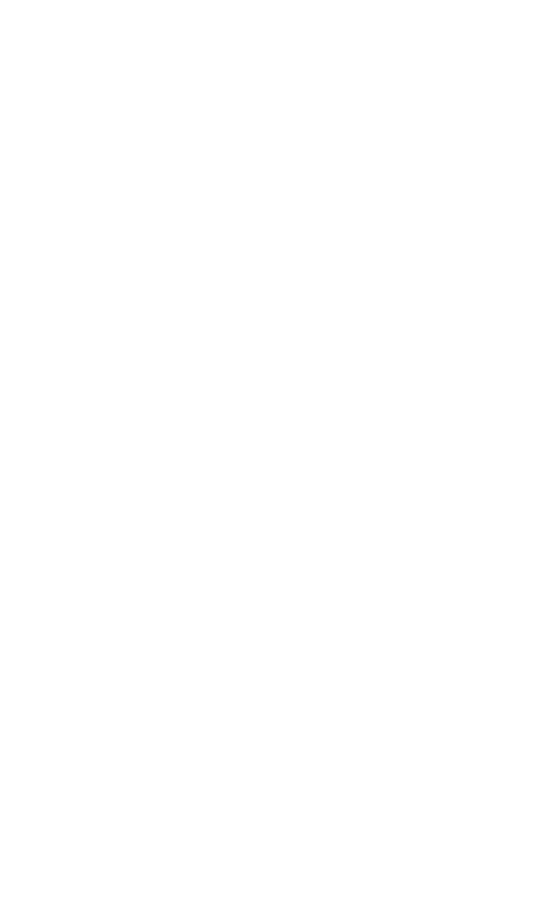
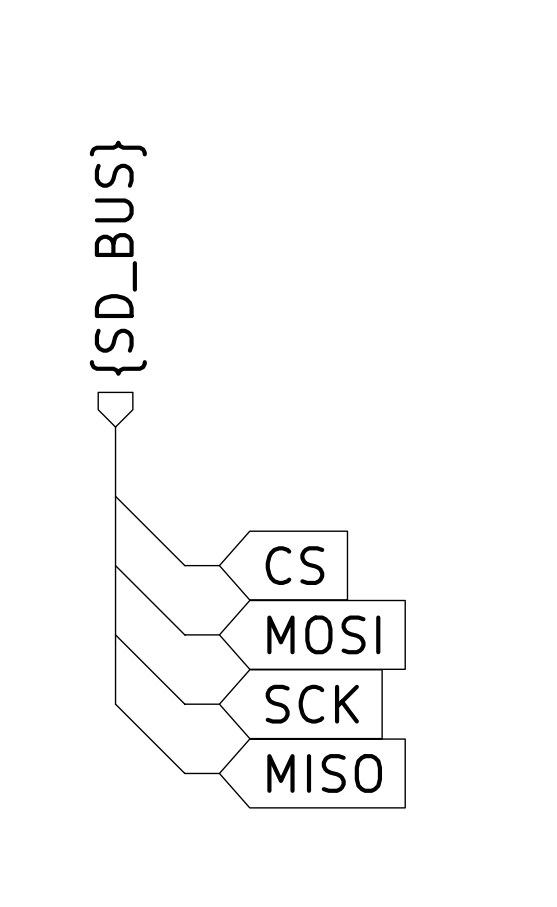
hierarchical label: none -> {SD_BUS} (118, 258)
bus: none -> (115, 427) (115, 704)
wire: none -> (115, 496) (184, 565) (219, 565)
wire: none -> (115, 565) (184, 634) (219, 634)
global label: none -> CS (294, 565)
wire: none -> (115, 634) (184, 704) (219, 704)
global label: none -> MOSI (323, 634)
wire: none -> (115, 704) (184, 773) (219, 773)
global label: none -> SCK (312, 704)
global label: none -> MISO (324, 773)

